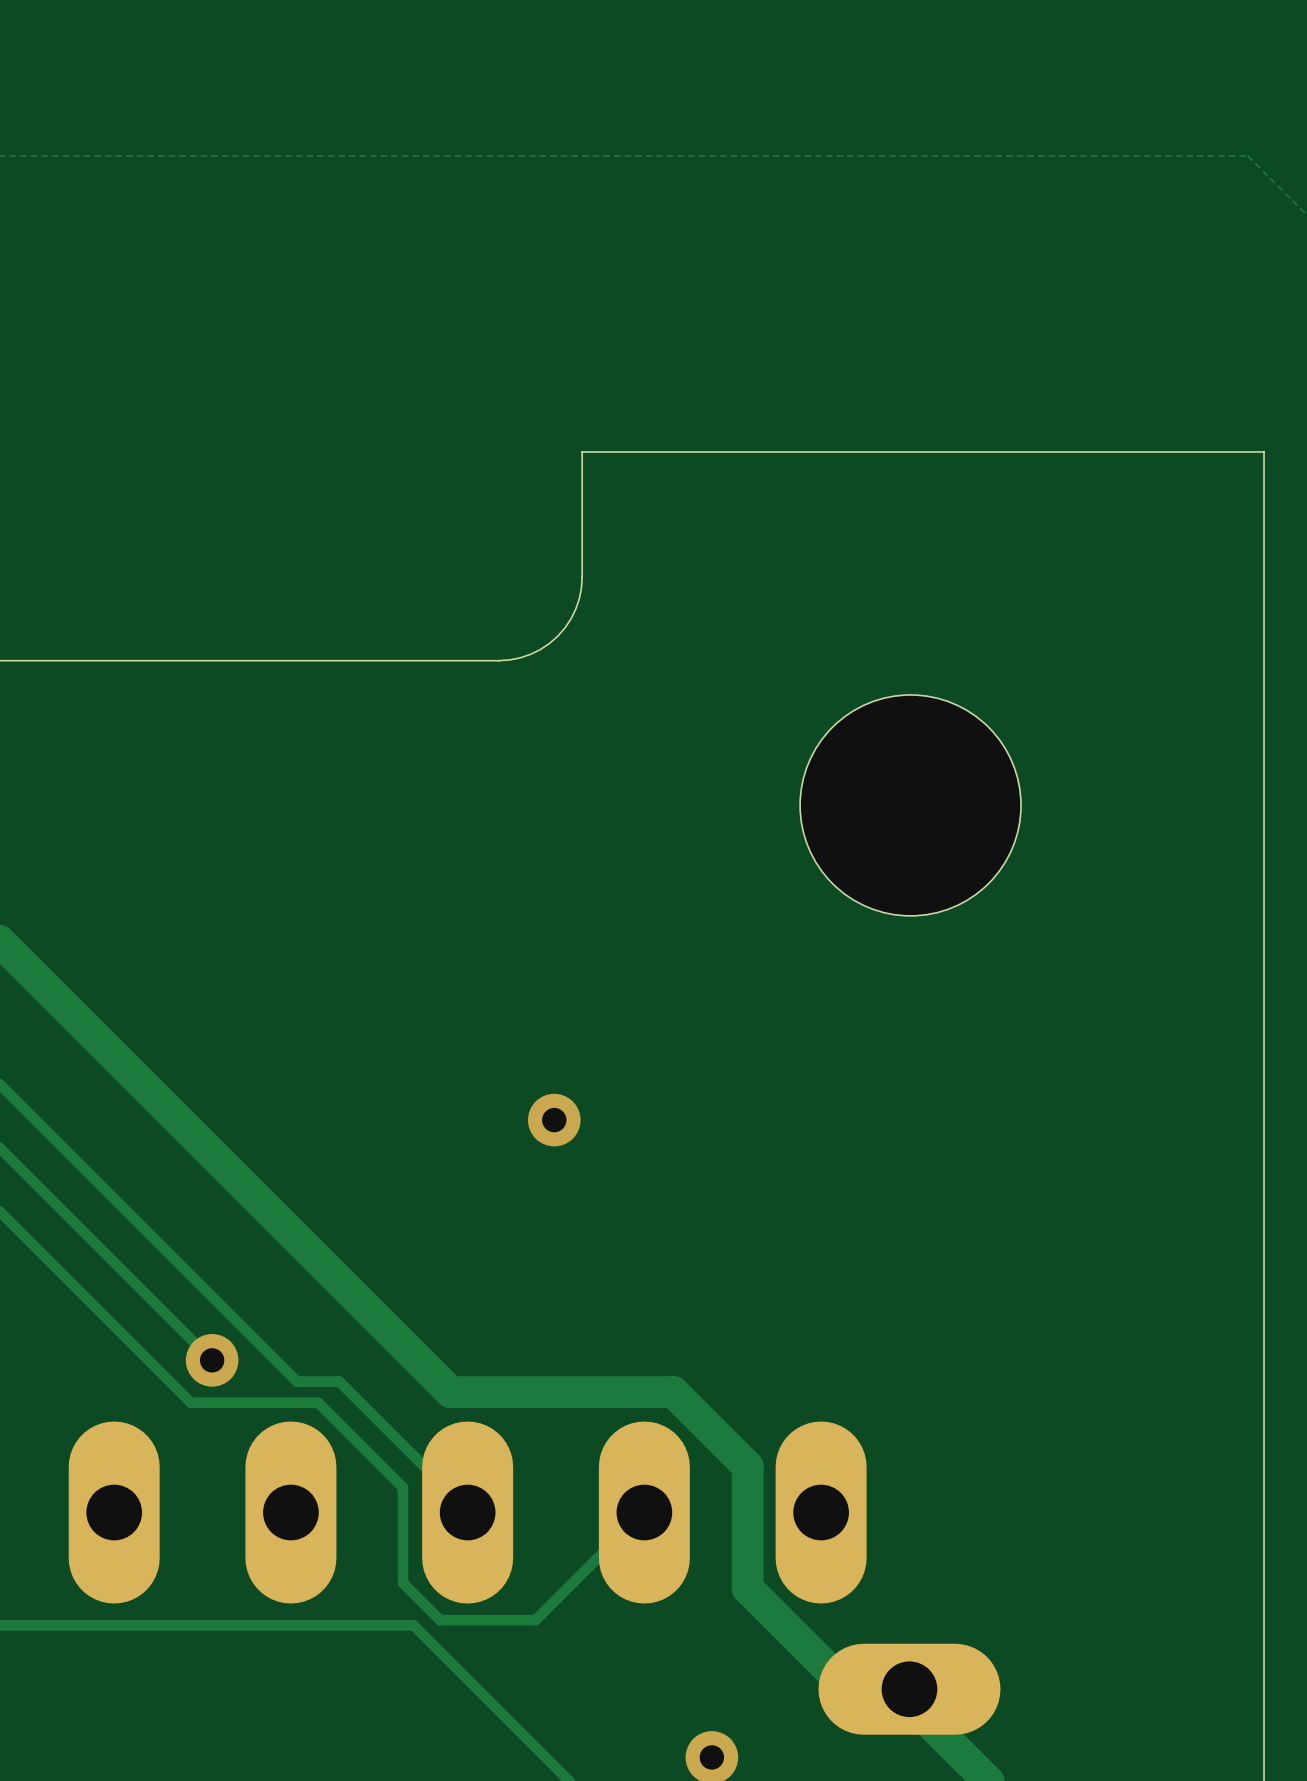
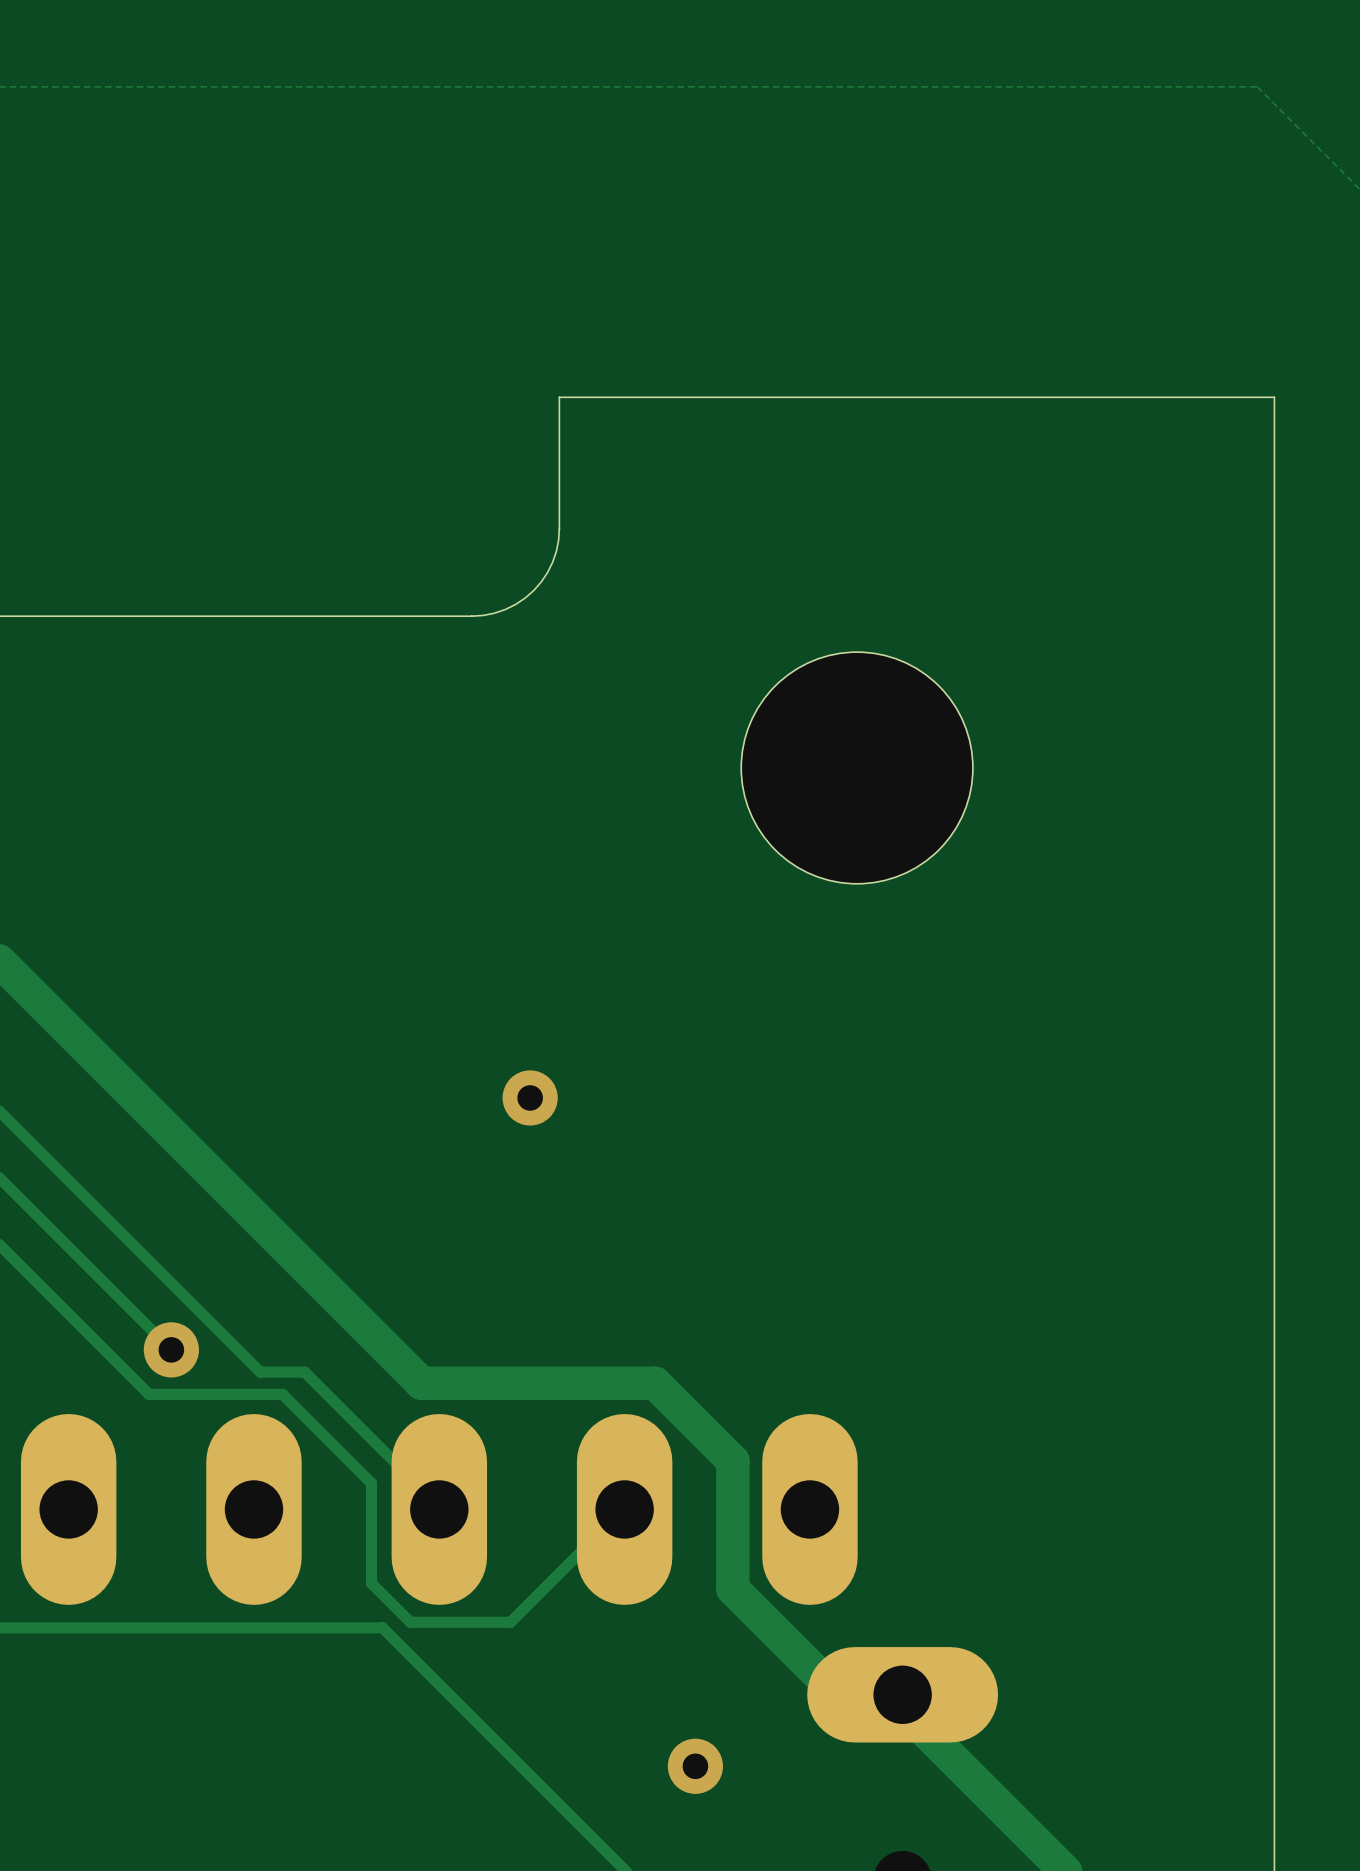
hole position: (910, 805) -> (857, 767)

